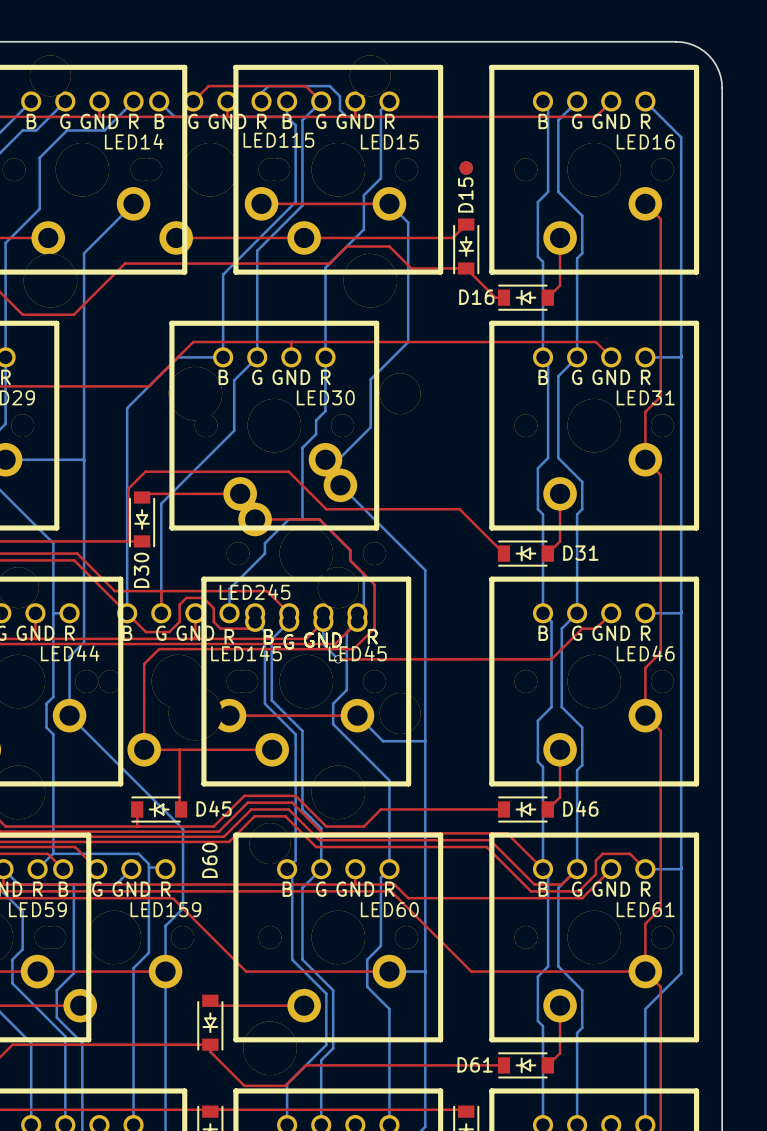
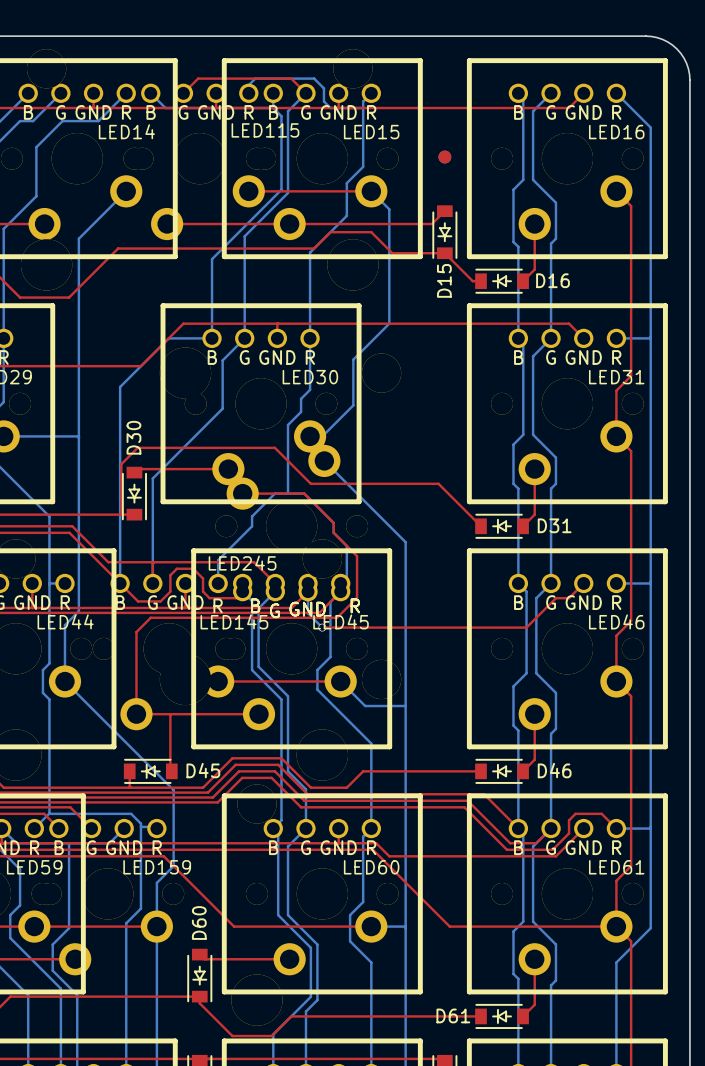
D15 name position: D15 (465, 194) -> D15 (444, 280)
D16 name position: D16 (476, 297) -> D16 (553, 280)
D30 name position: D30 (141, 570) -> D30 (133, 437)
D60 name position: D60 (209, 860) -> D60 (199, 923)

